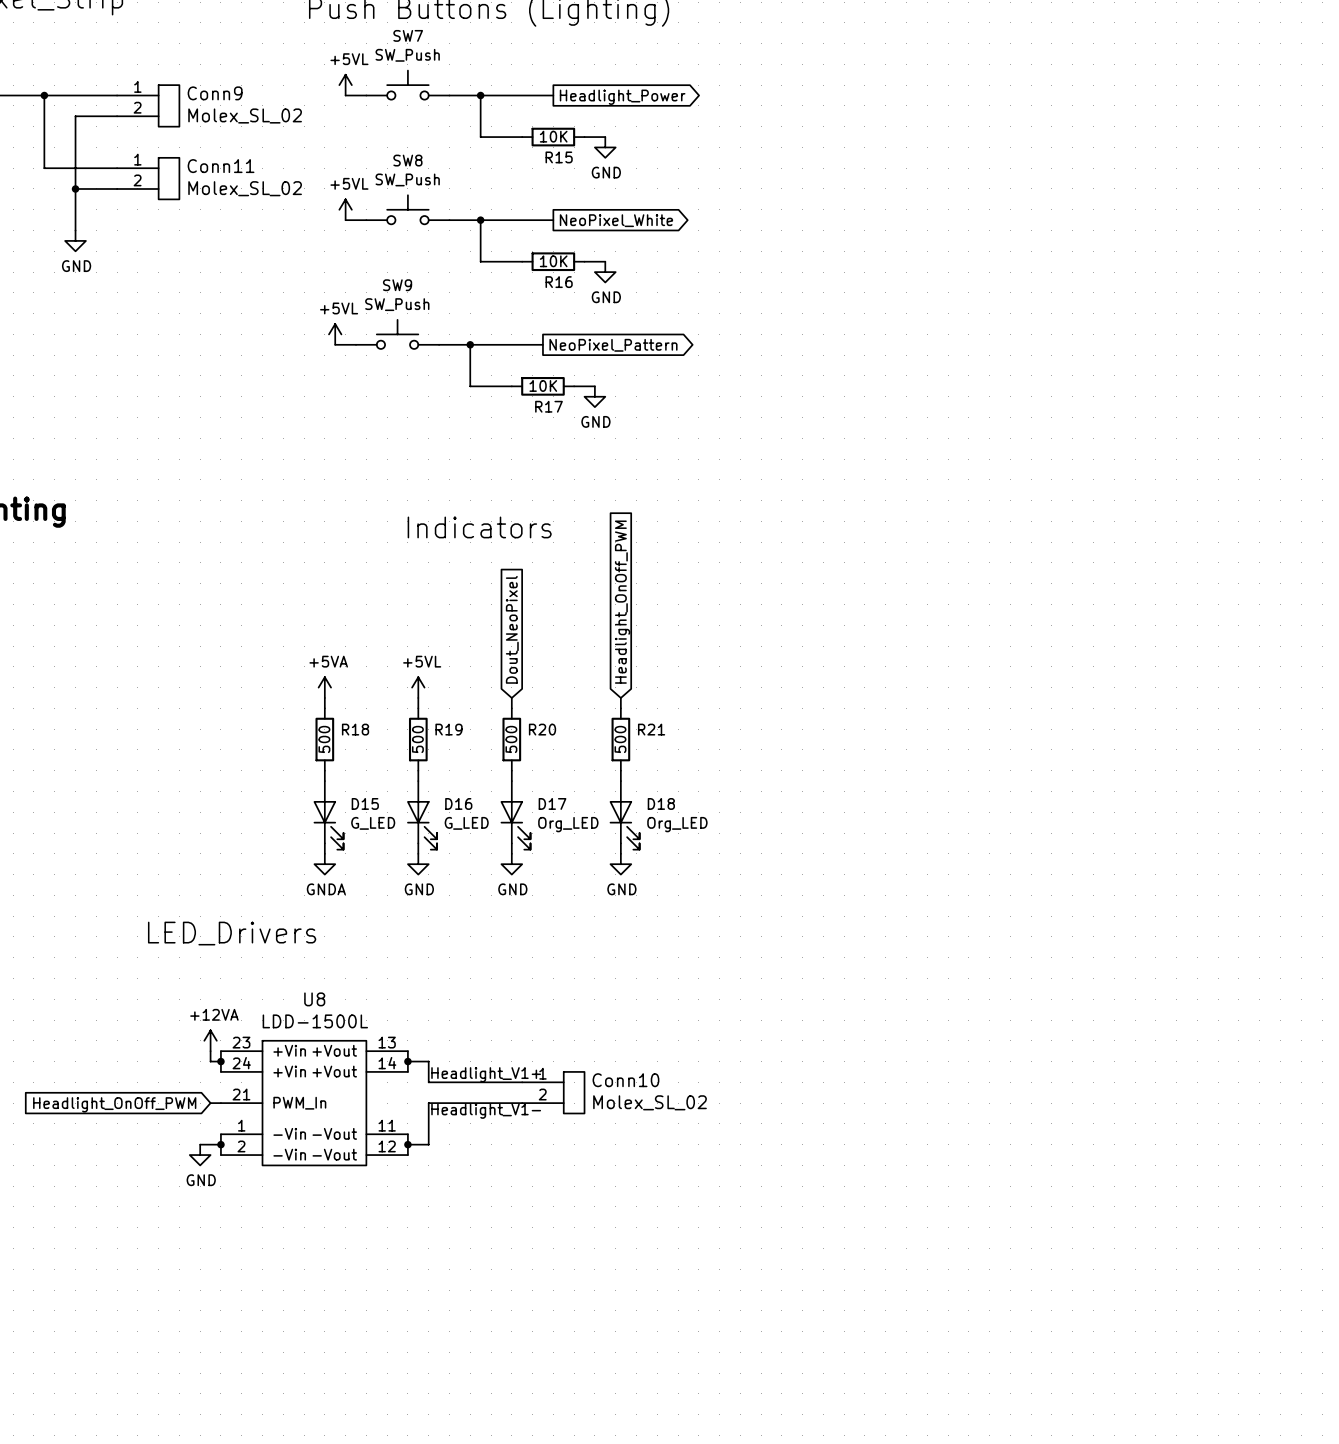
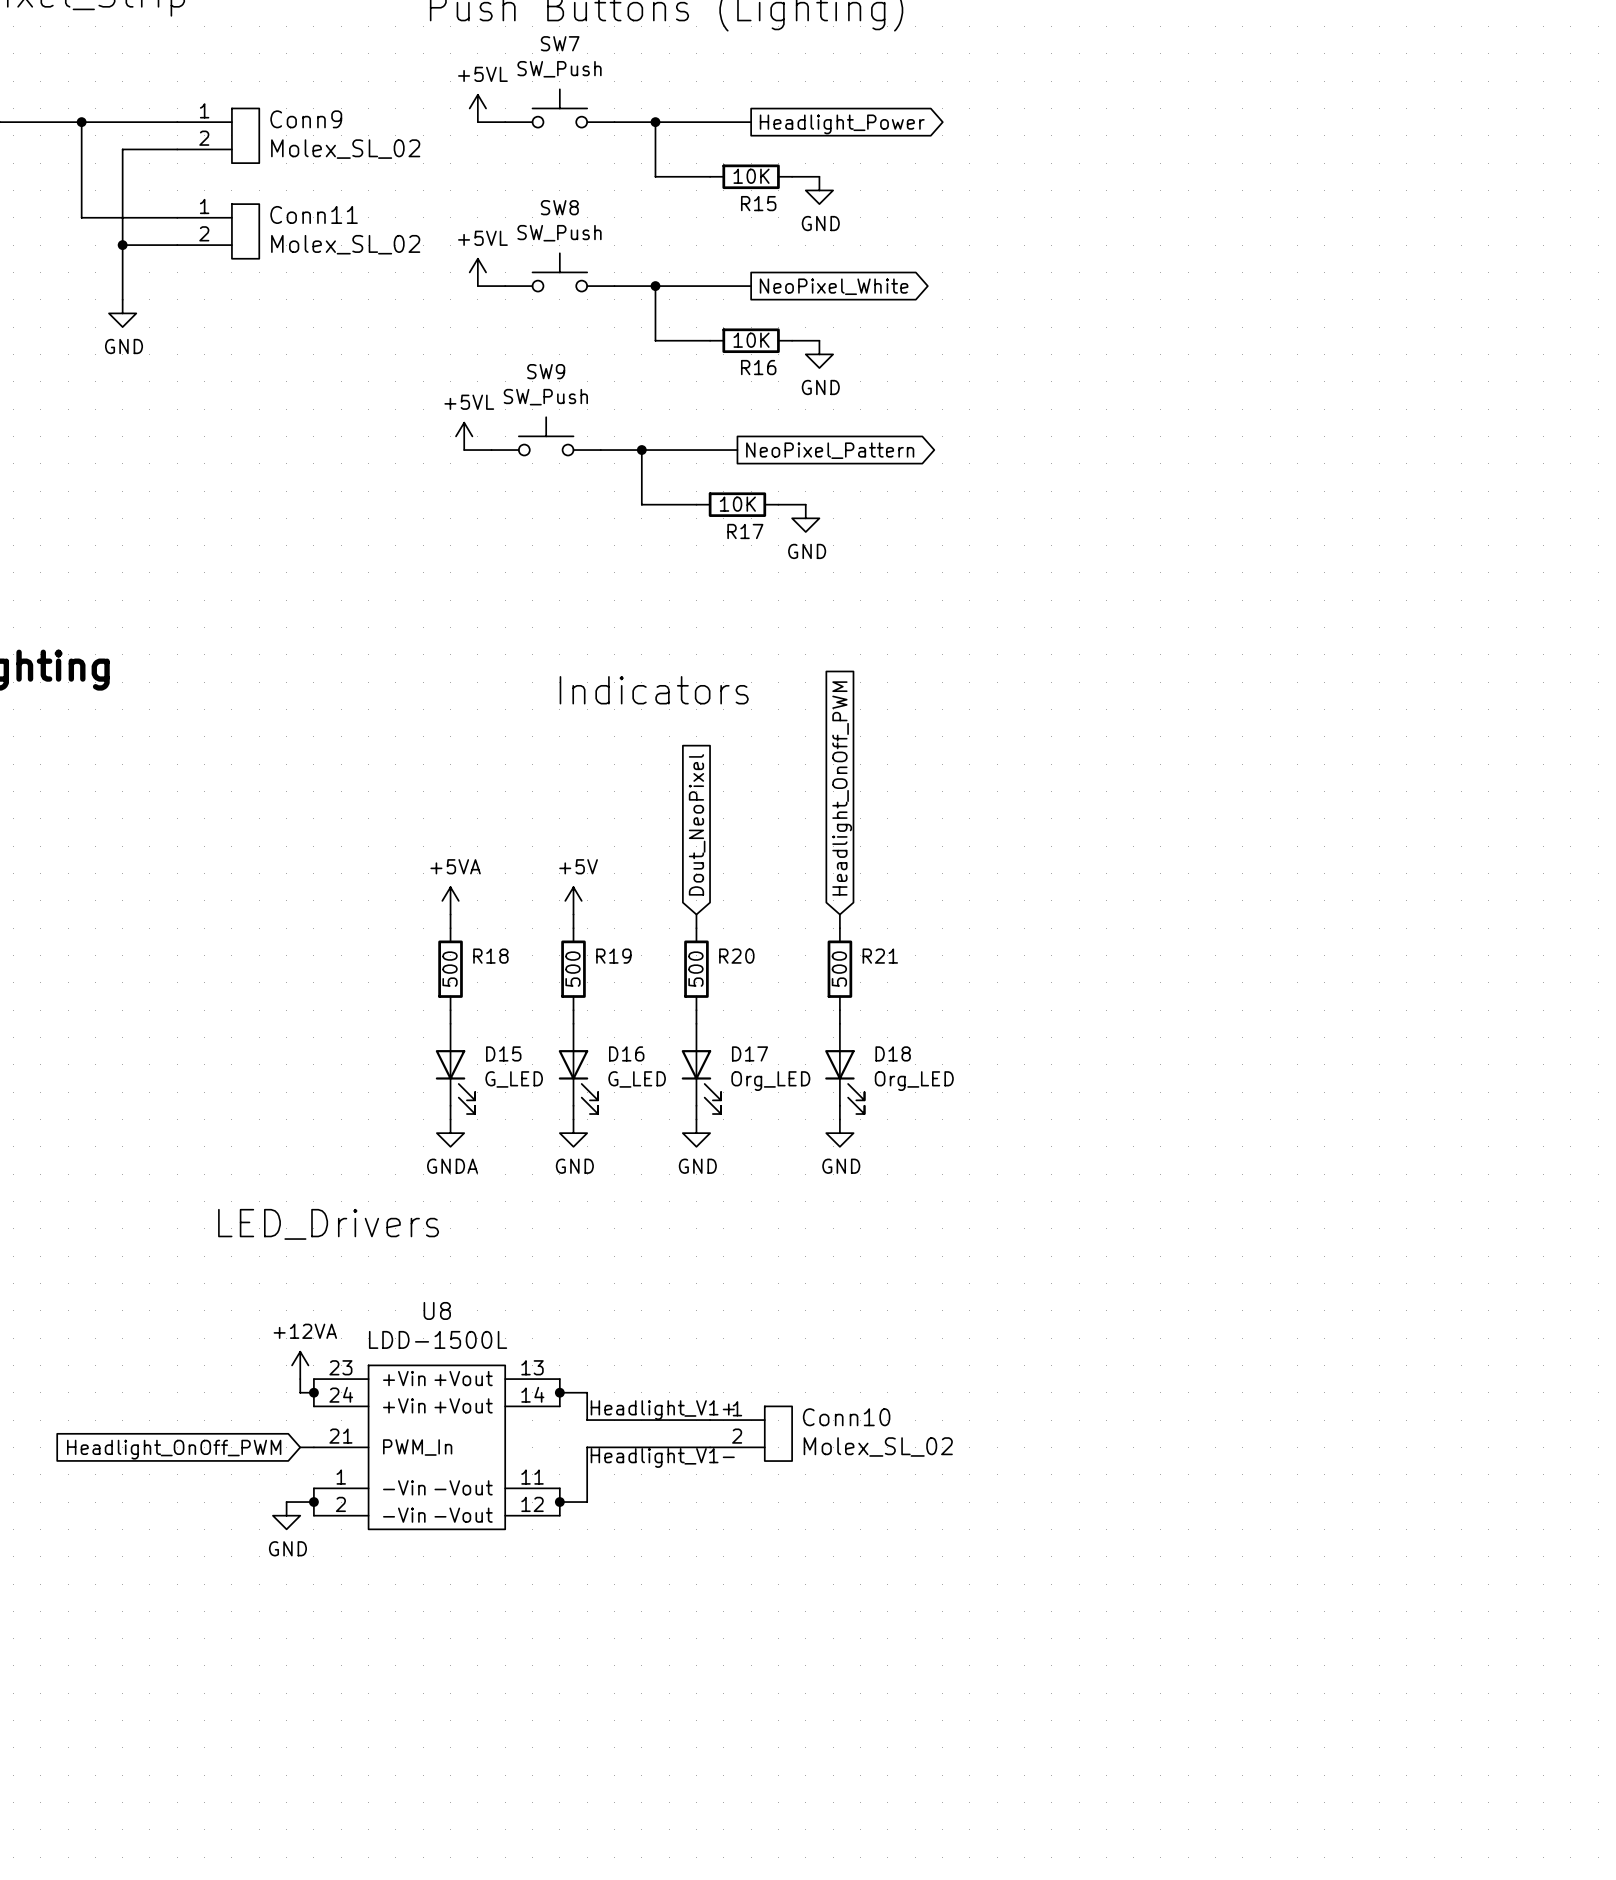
power symbol: +5VL (418, 687) -> +5V (573, 900)

